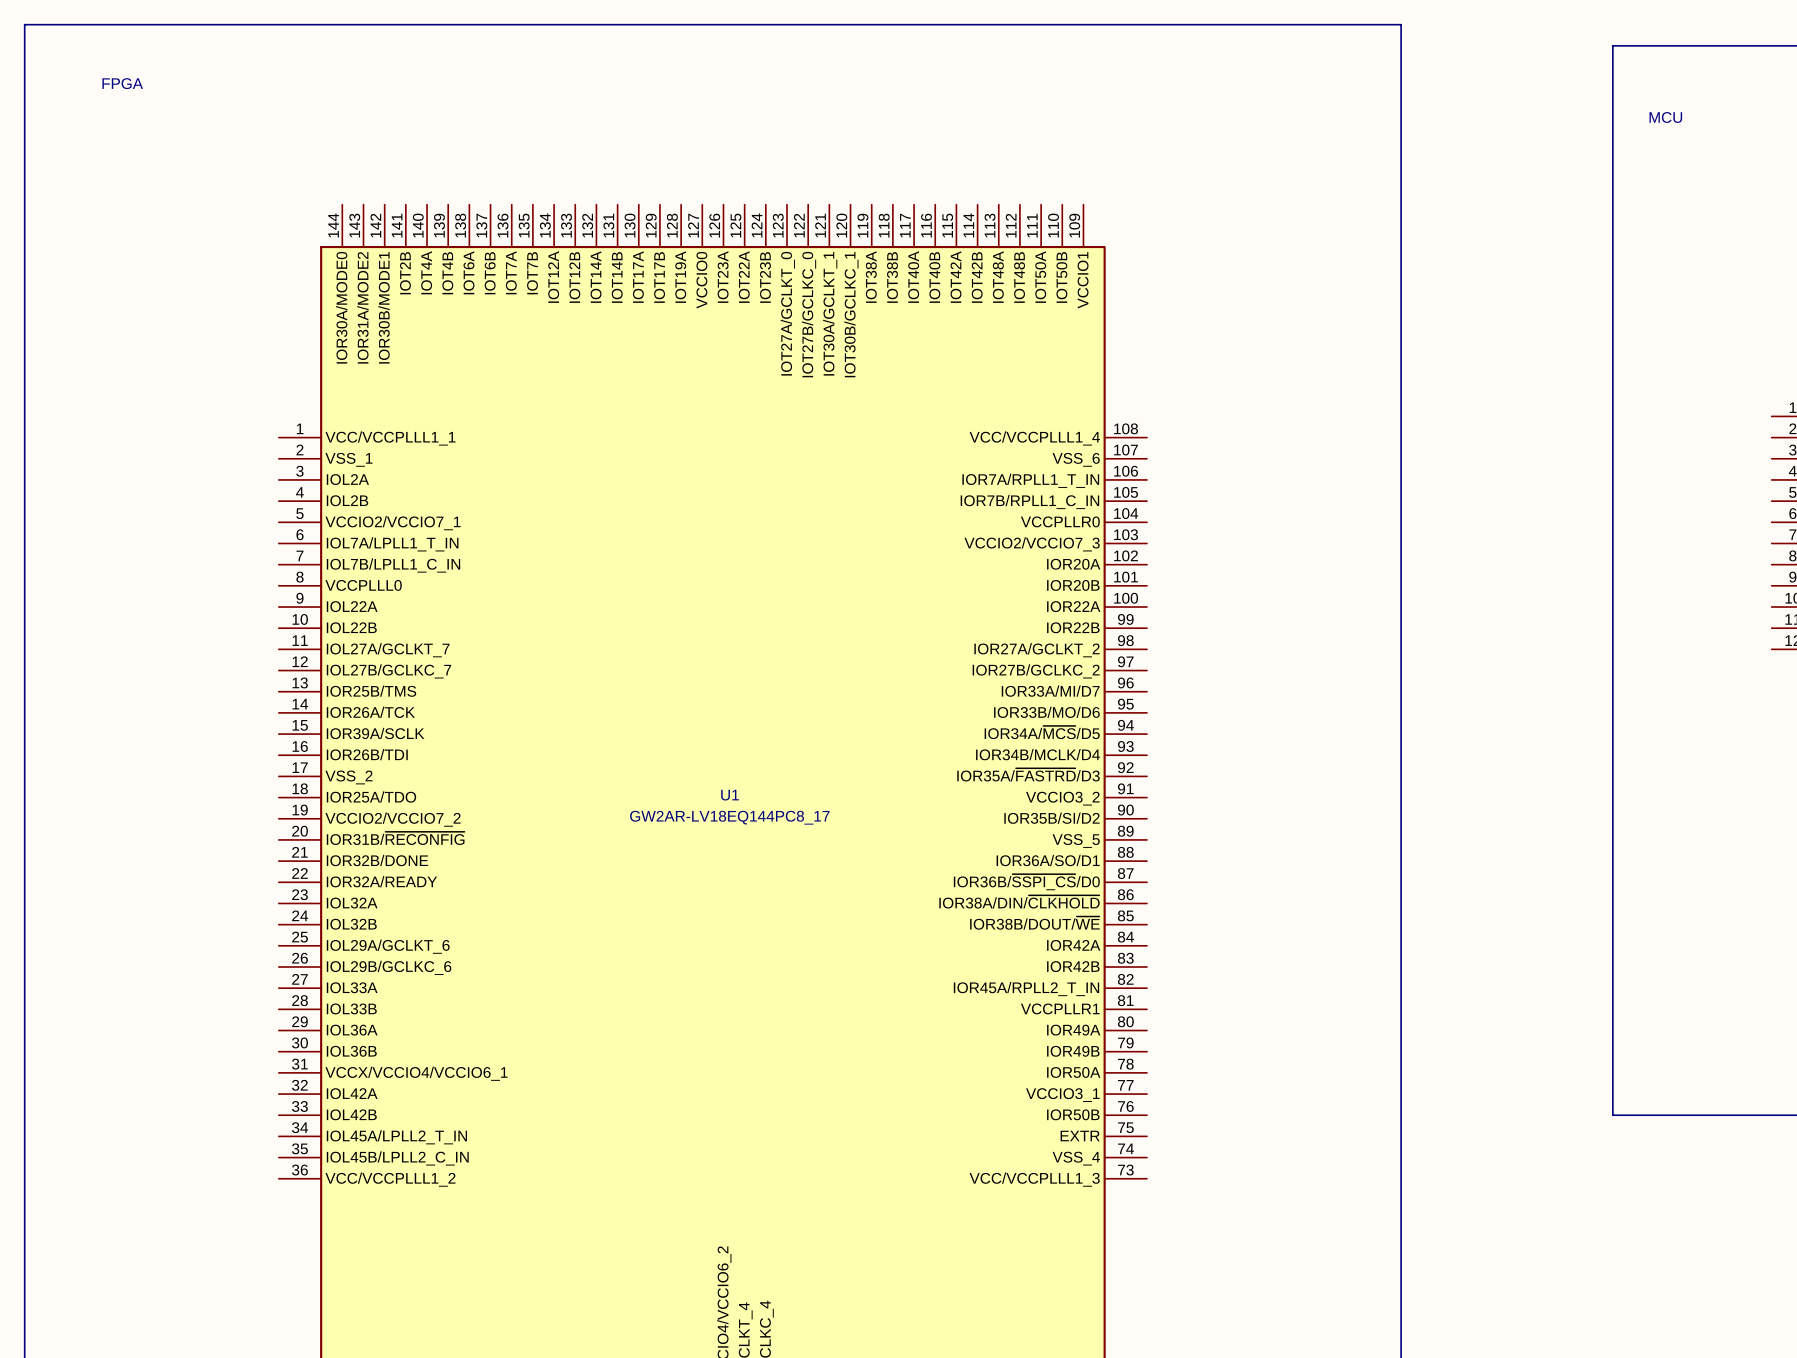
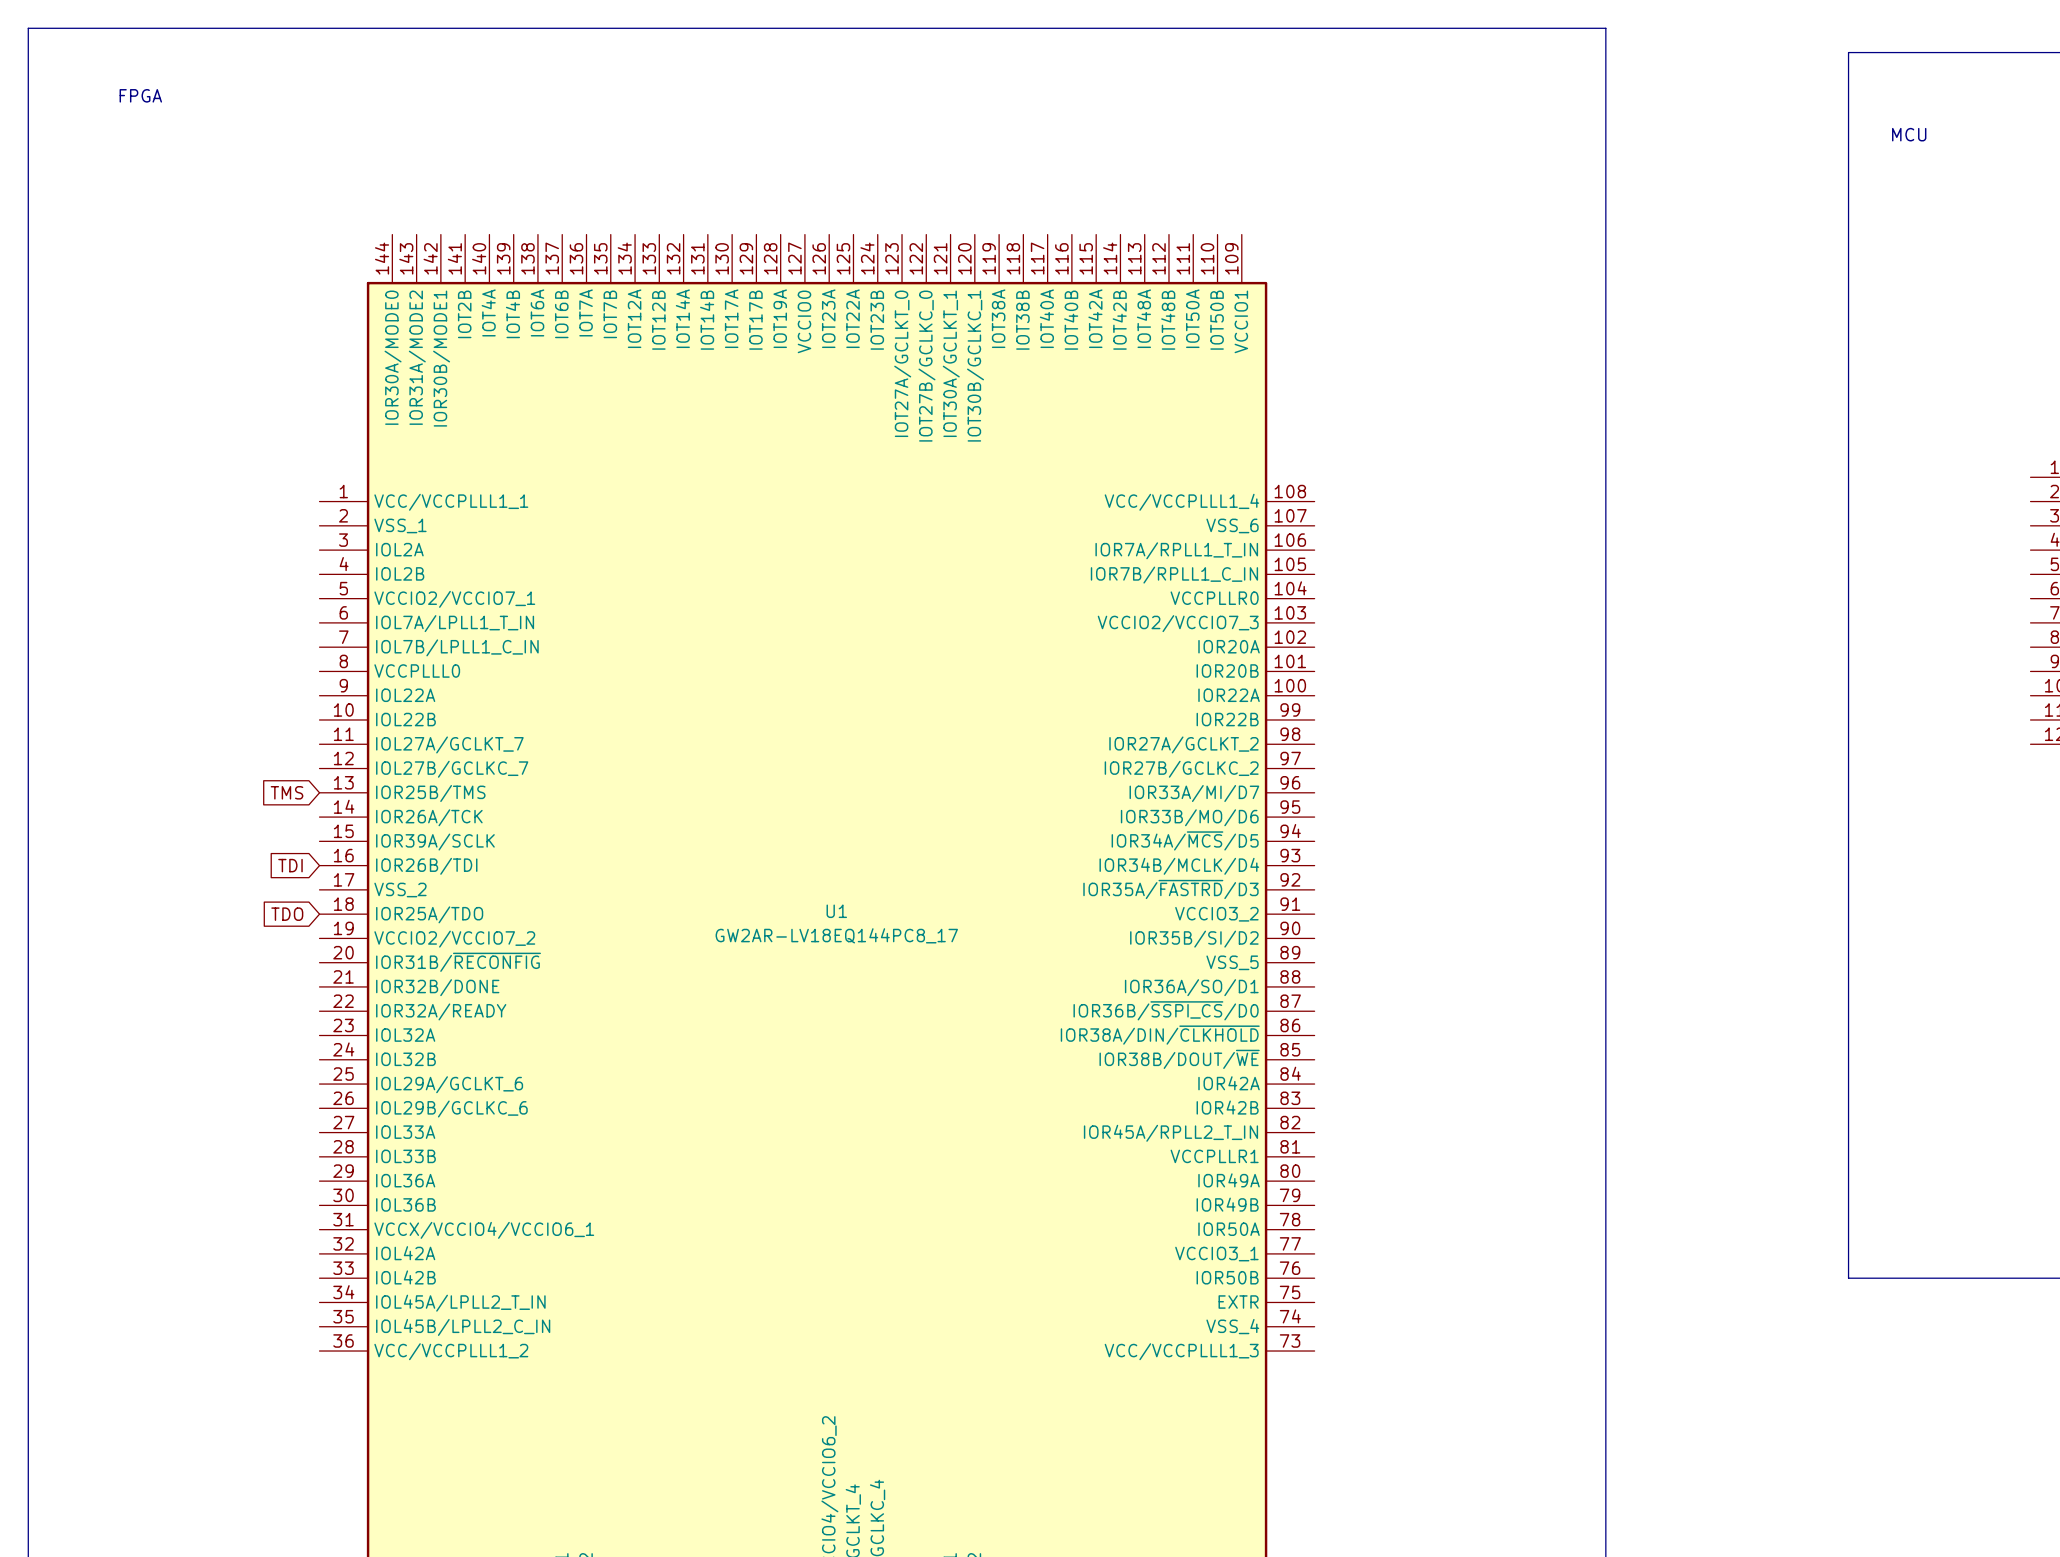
global label: none -> TMS (287, 792)
global label: none -> TDI (290, 865)
global label: none -> TDO (287, 914)

